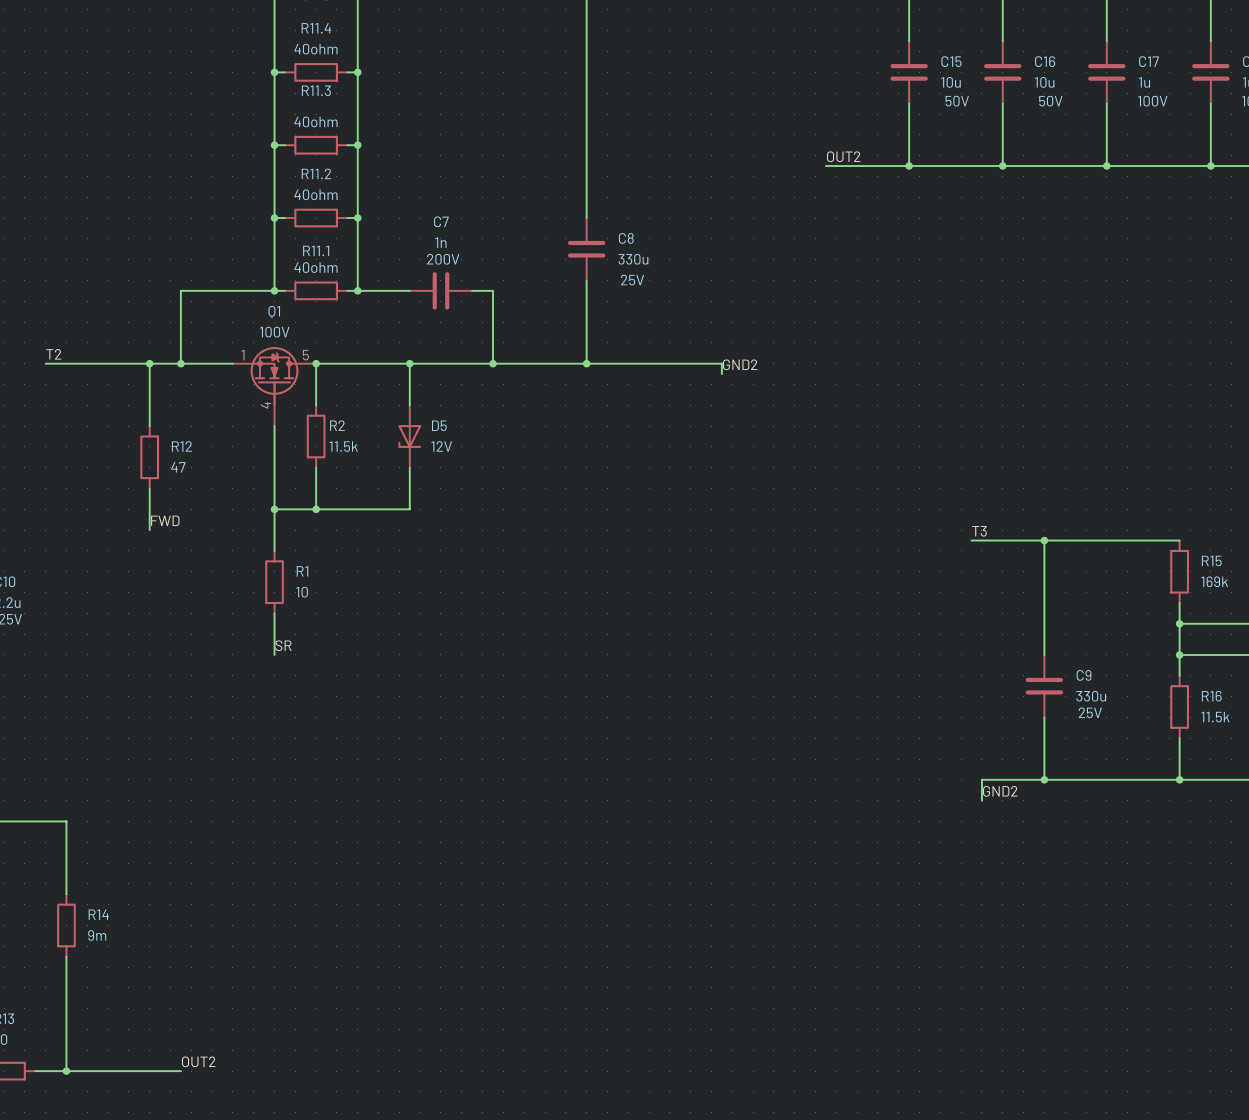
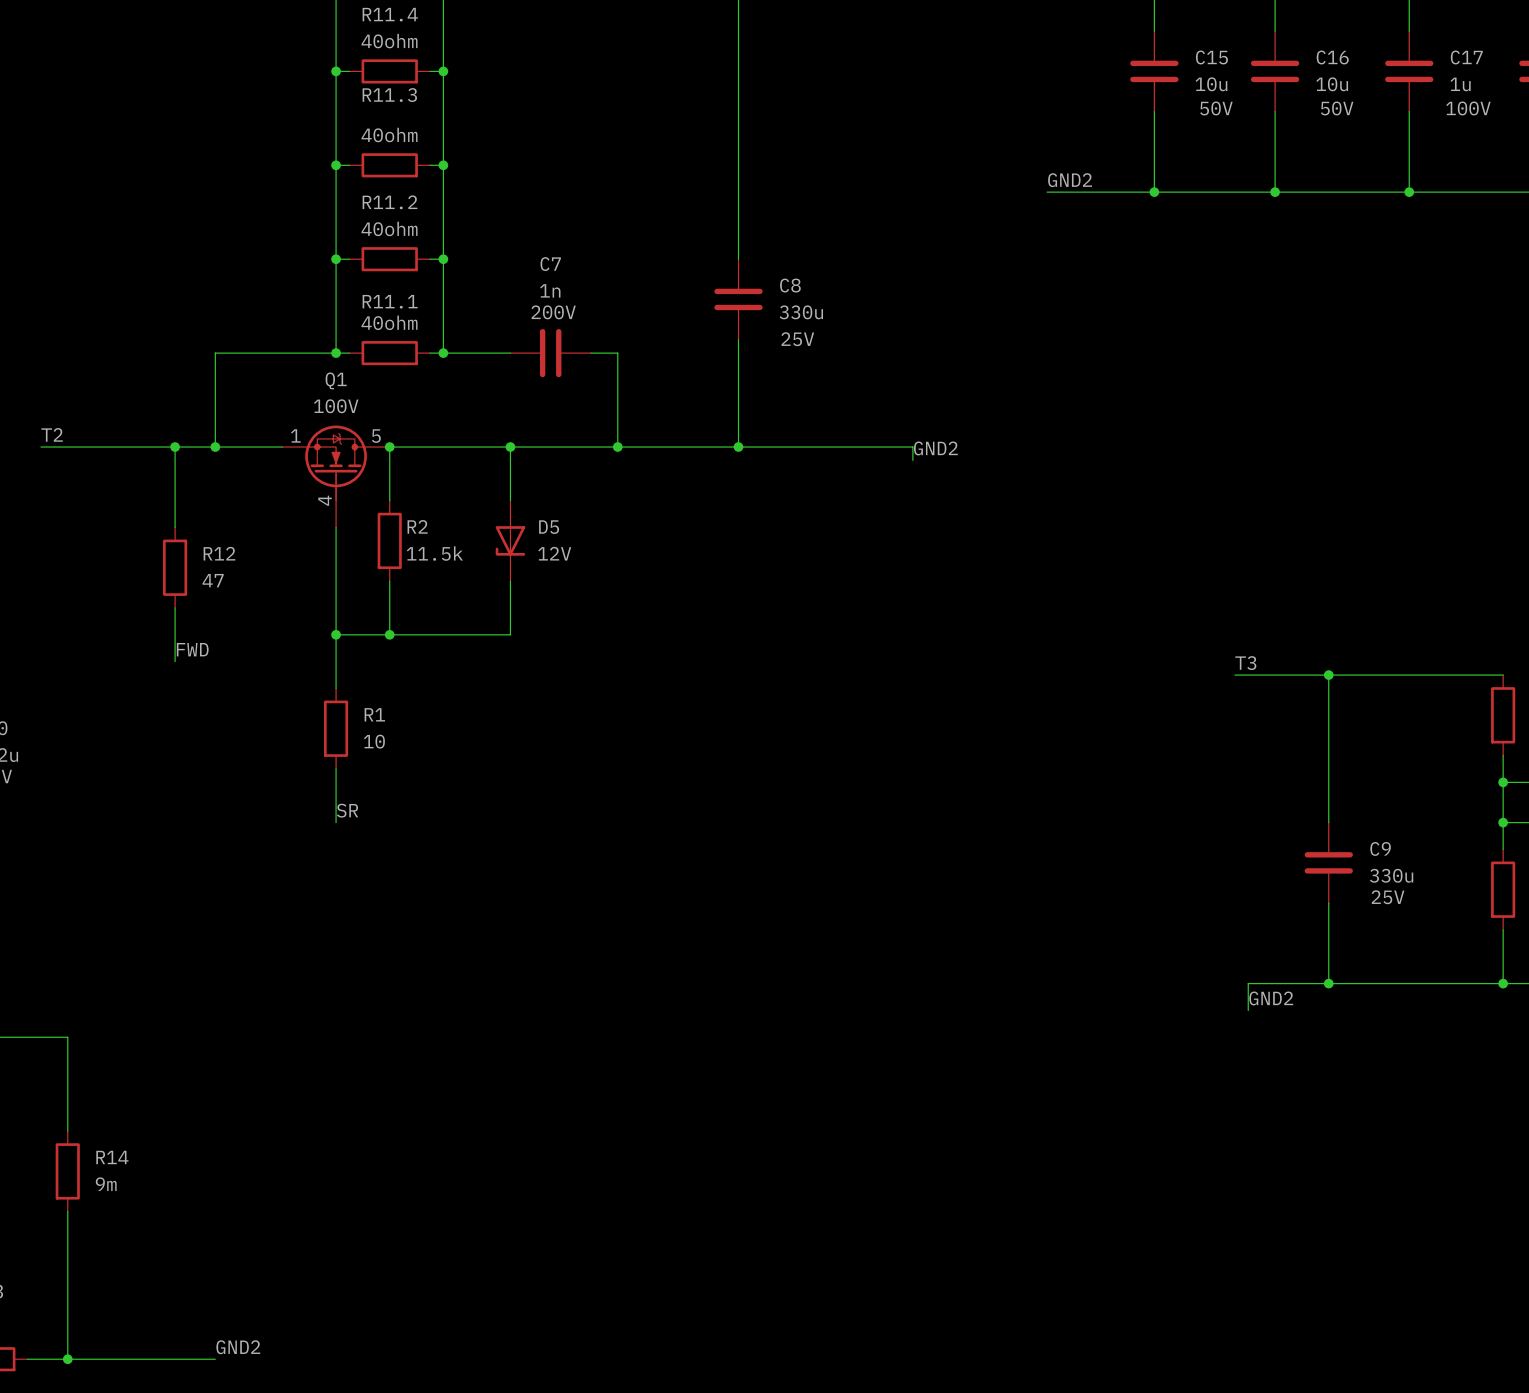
label: OUT2 (843, 156) -> GND2 (1070, 180)
label: OUT2 (198, 1061) -> GND2 (238, 1347)

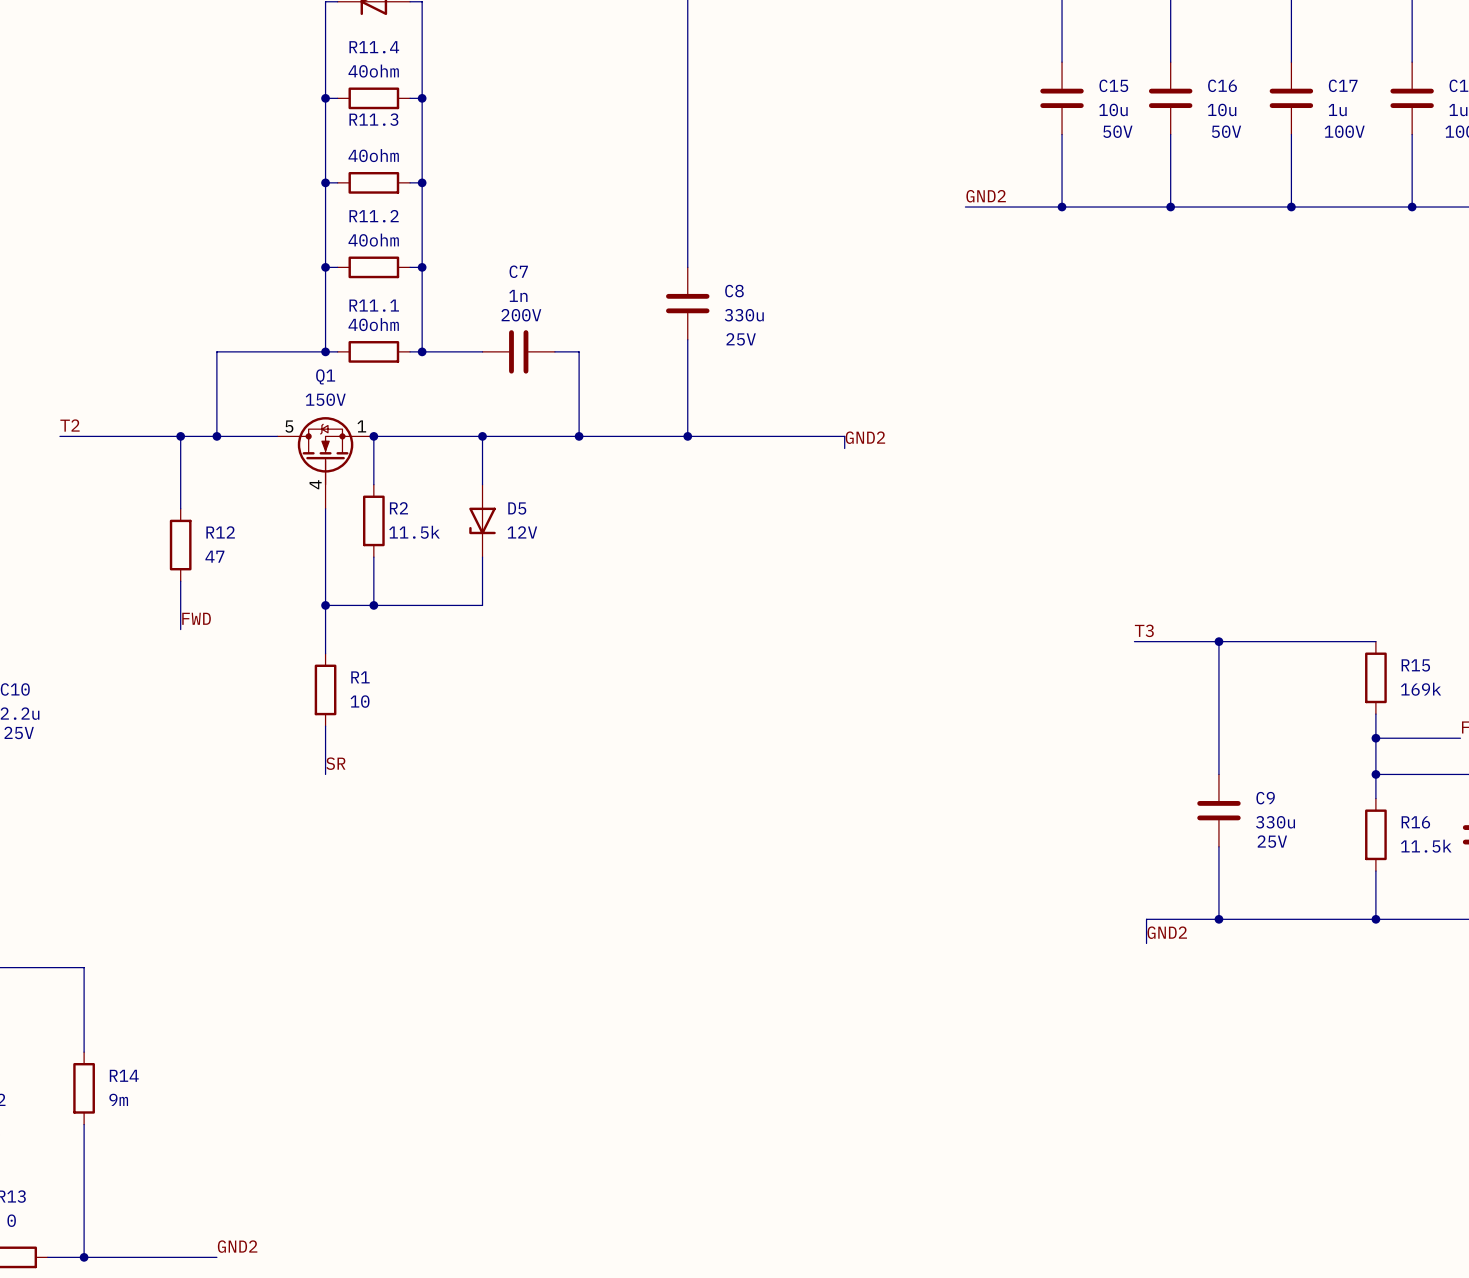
Q1 value: 100V (336, 406) -> 150V (325, 399)
Q1 flip: as is (336, 463) -> left-right (325, 450)

